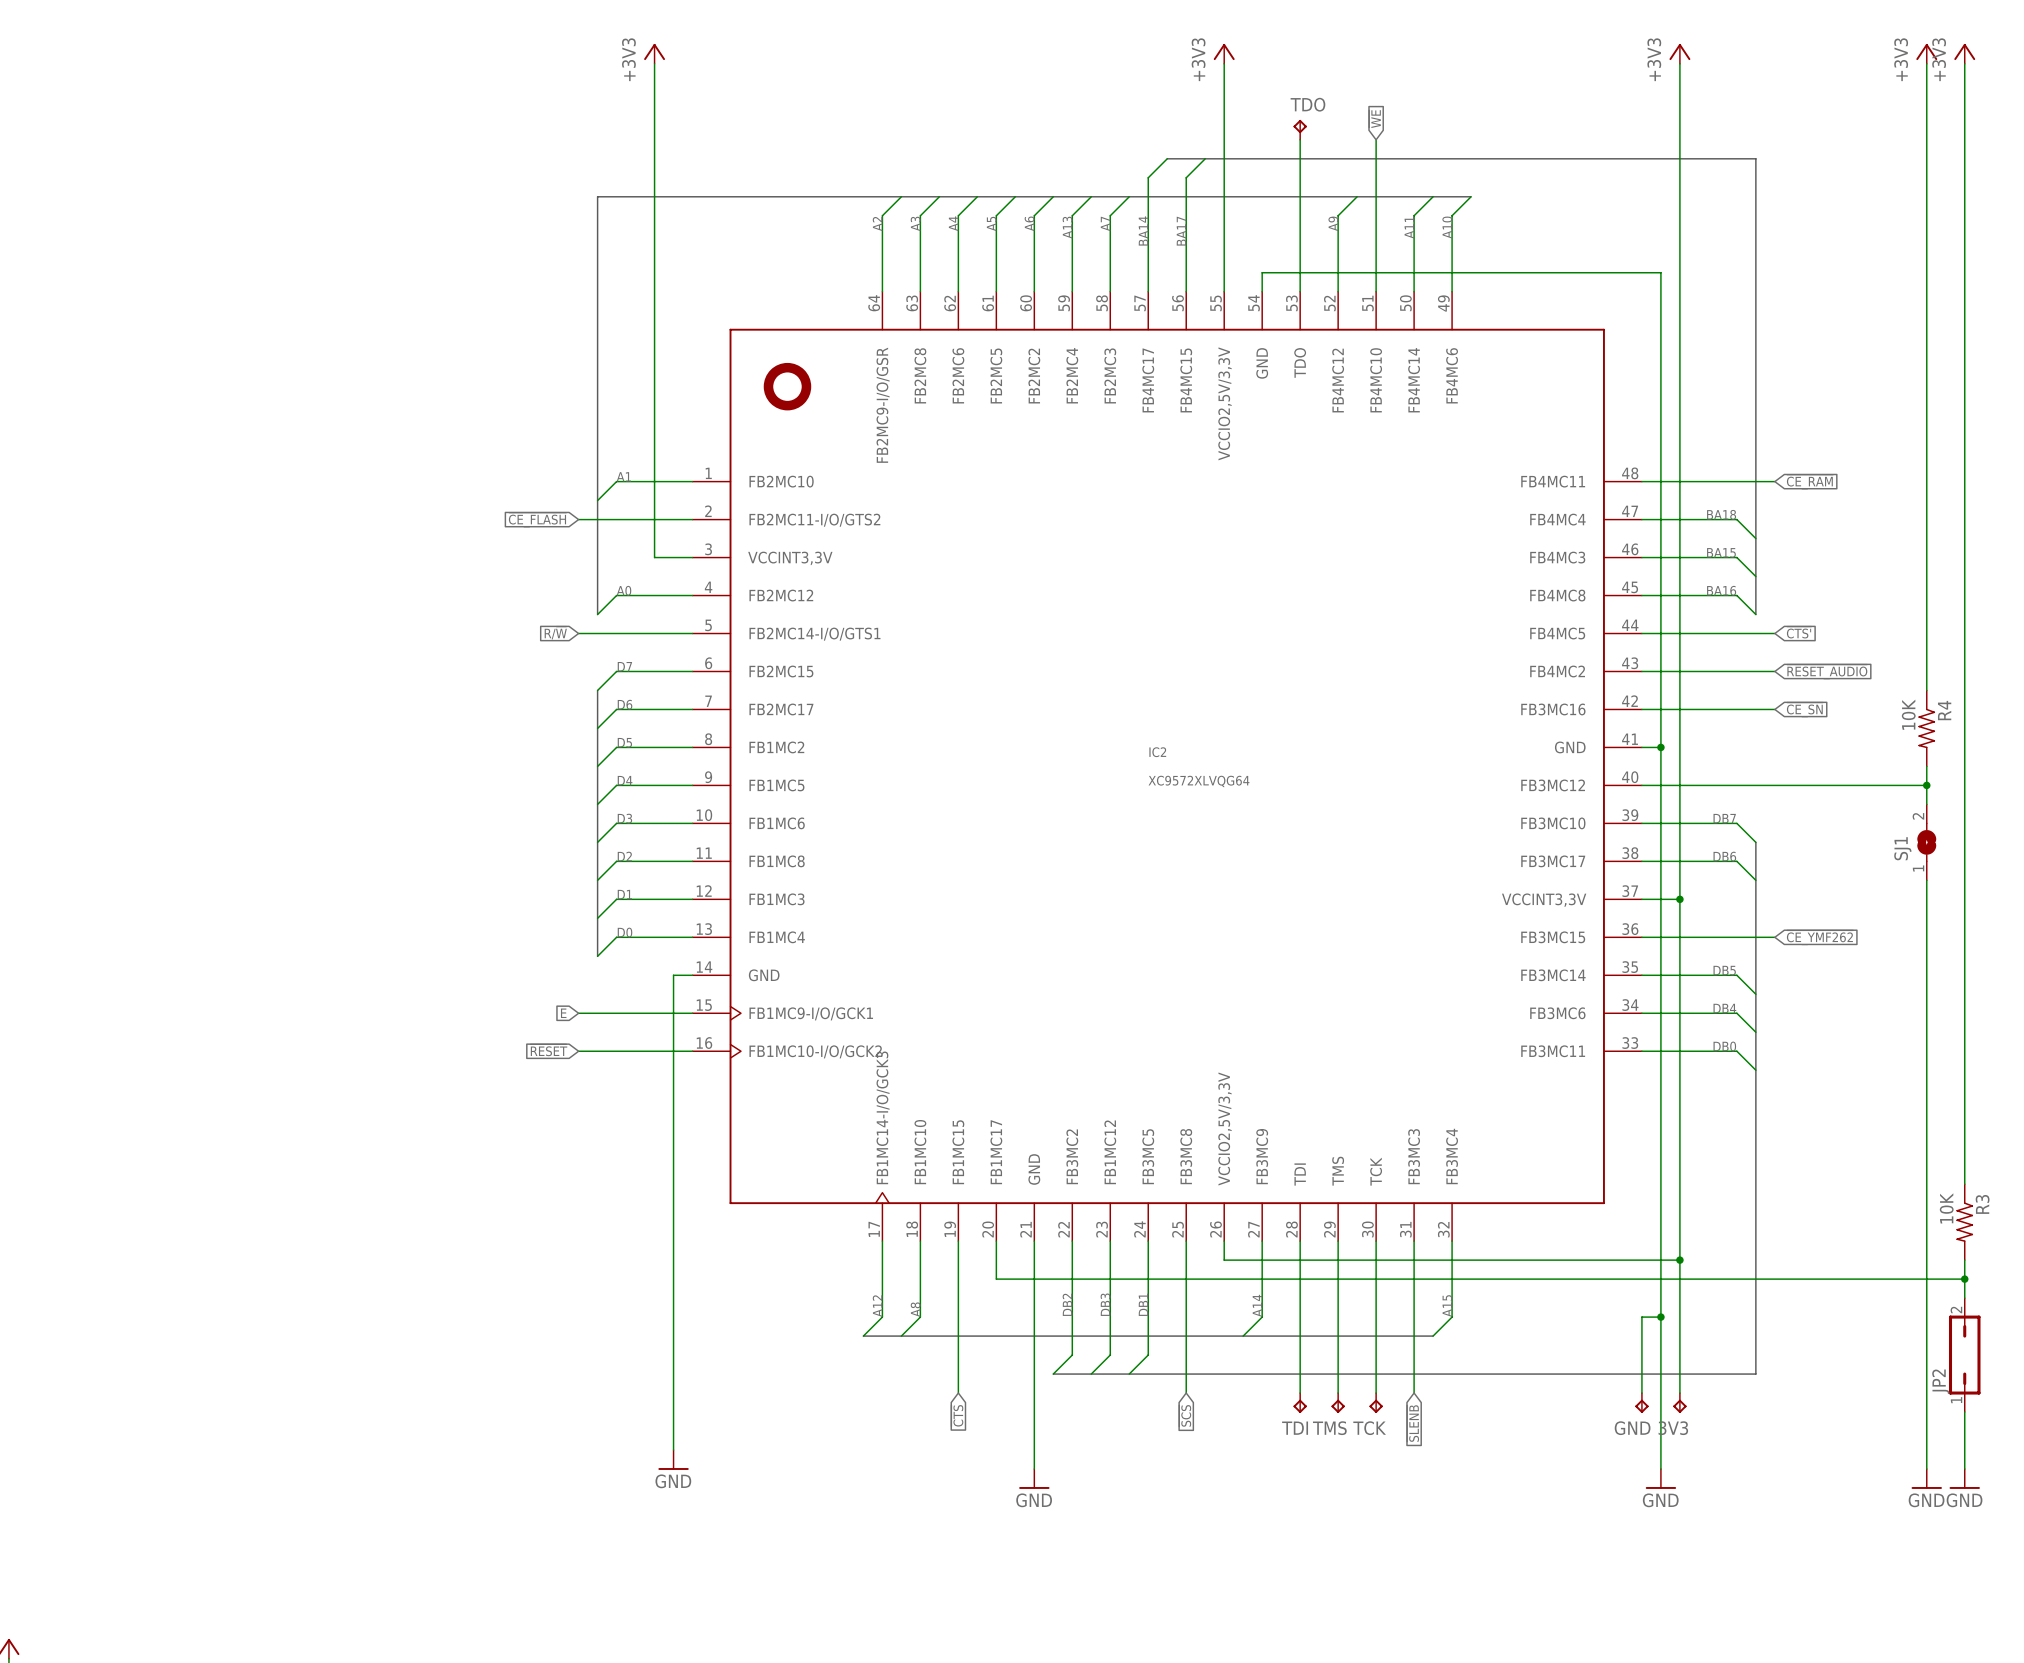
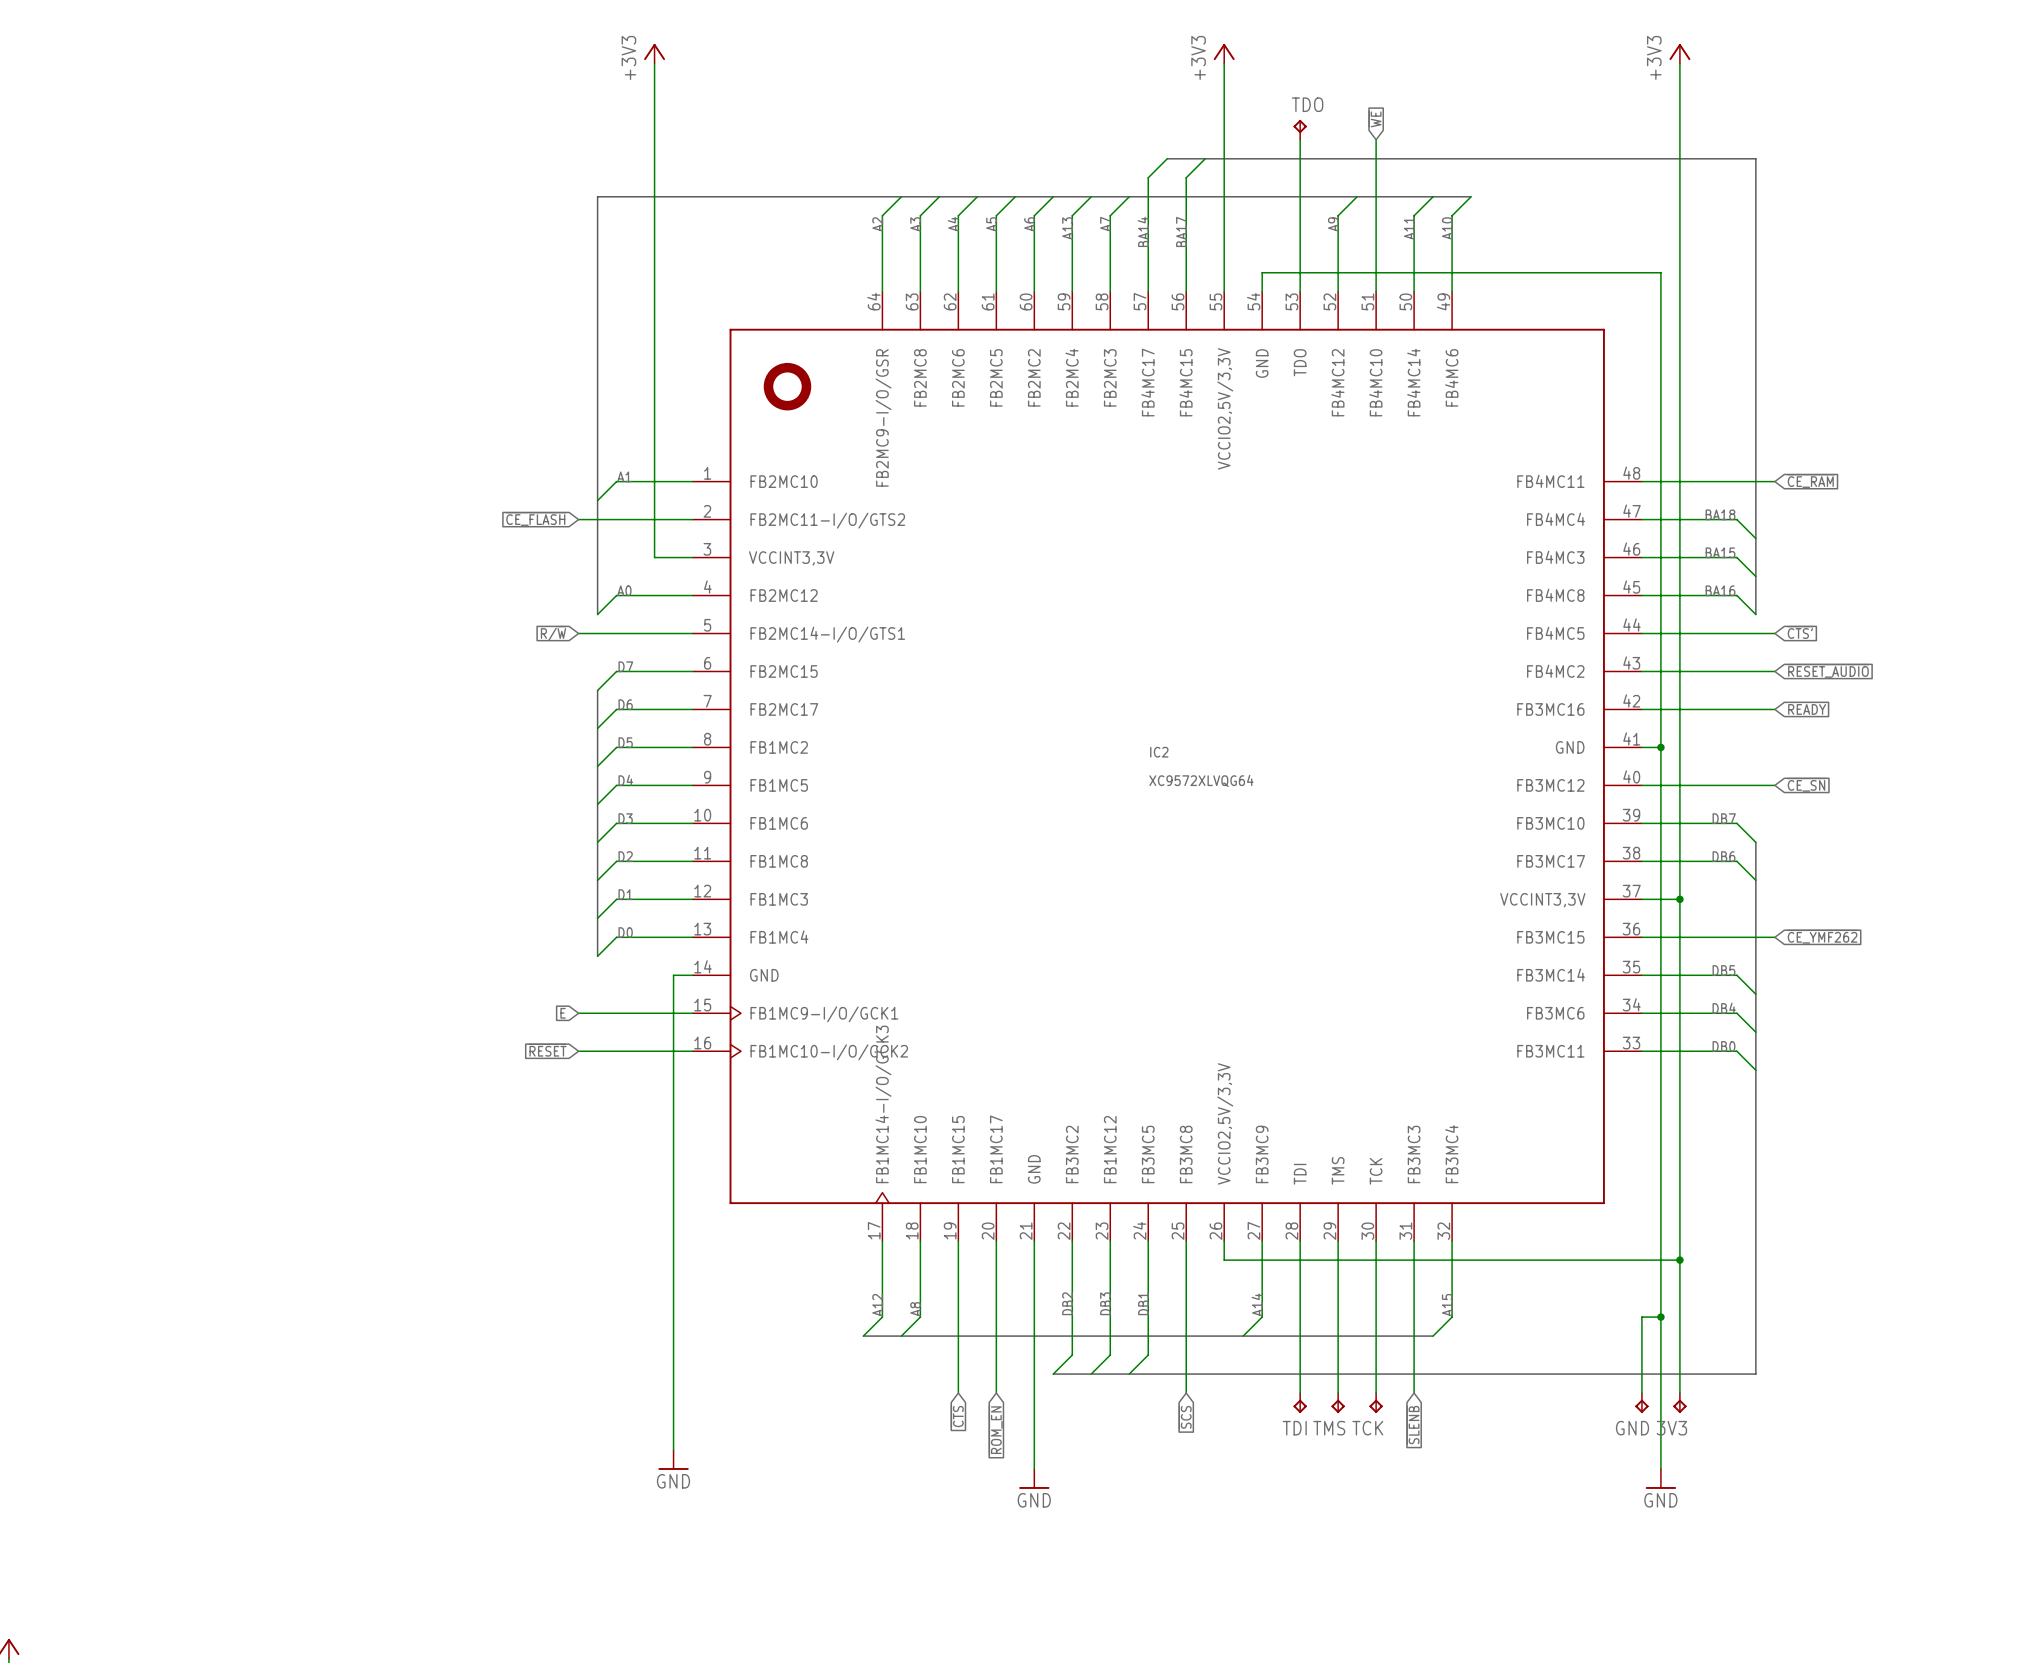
power symbol: +3V3 (1926, 53) -> none
power symbol: +3V3 (1964, 53) -> none
wire: (1926, 63) (1926, 690) -> none
wire: (1964, 63) (1964, 1184) -> none
global label: ~{CE_SN} (1804, 709) -> READY (1807, 709)
R4: 10K (1926, 728) -> none
wire: (1926, 766) (1926, 804) -> none
wire: (1774, 785) (1926, 785) -> none
global label: none -> ~{CE_SN} (1806, 784)
junction: (1926, 785) -> none
SJ1: (1926, 842) -> none
wire: (1926, 880) (1926, 1468) -> none
R3: 10K (1964, 1222) -> none
wire: (1964, 1260) (1964, 1298) -> none
wire: (996, 1279) (1964, 1279) -> (996, 1279) (996, 1393)
junction: (1964, 1279) -> none
JP2: (1964, 1355) -> none
wire: (1964, 1412) (1964, 1468) -> none
global label: none -> ~{ROM_EN} (995, 1430)
power symbol: GND (1926, 1478) -> none
power symbol: GND (1964, 1478) -> none

